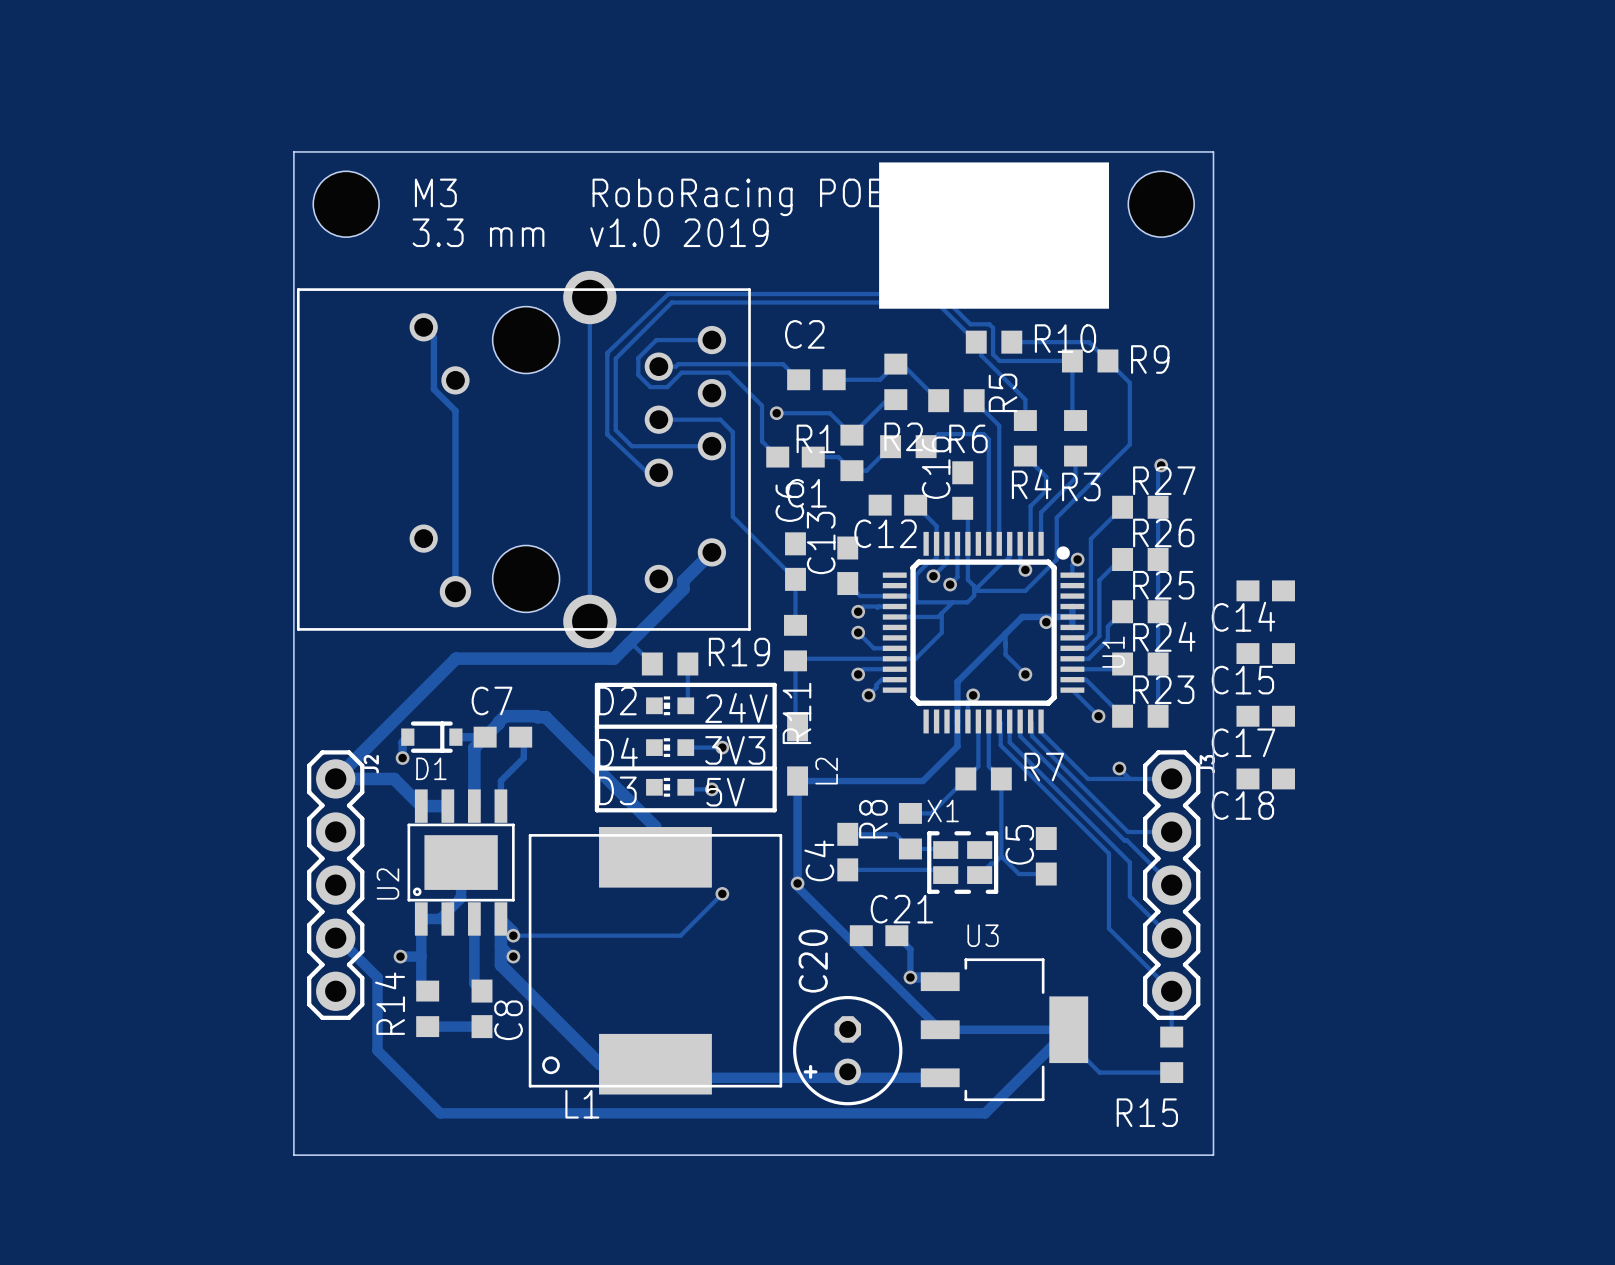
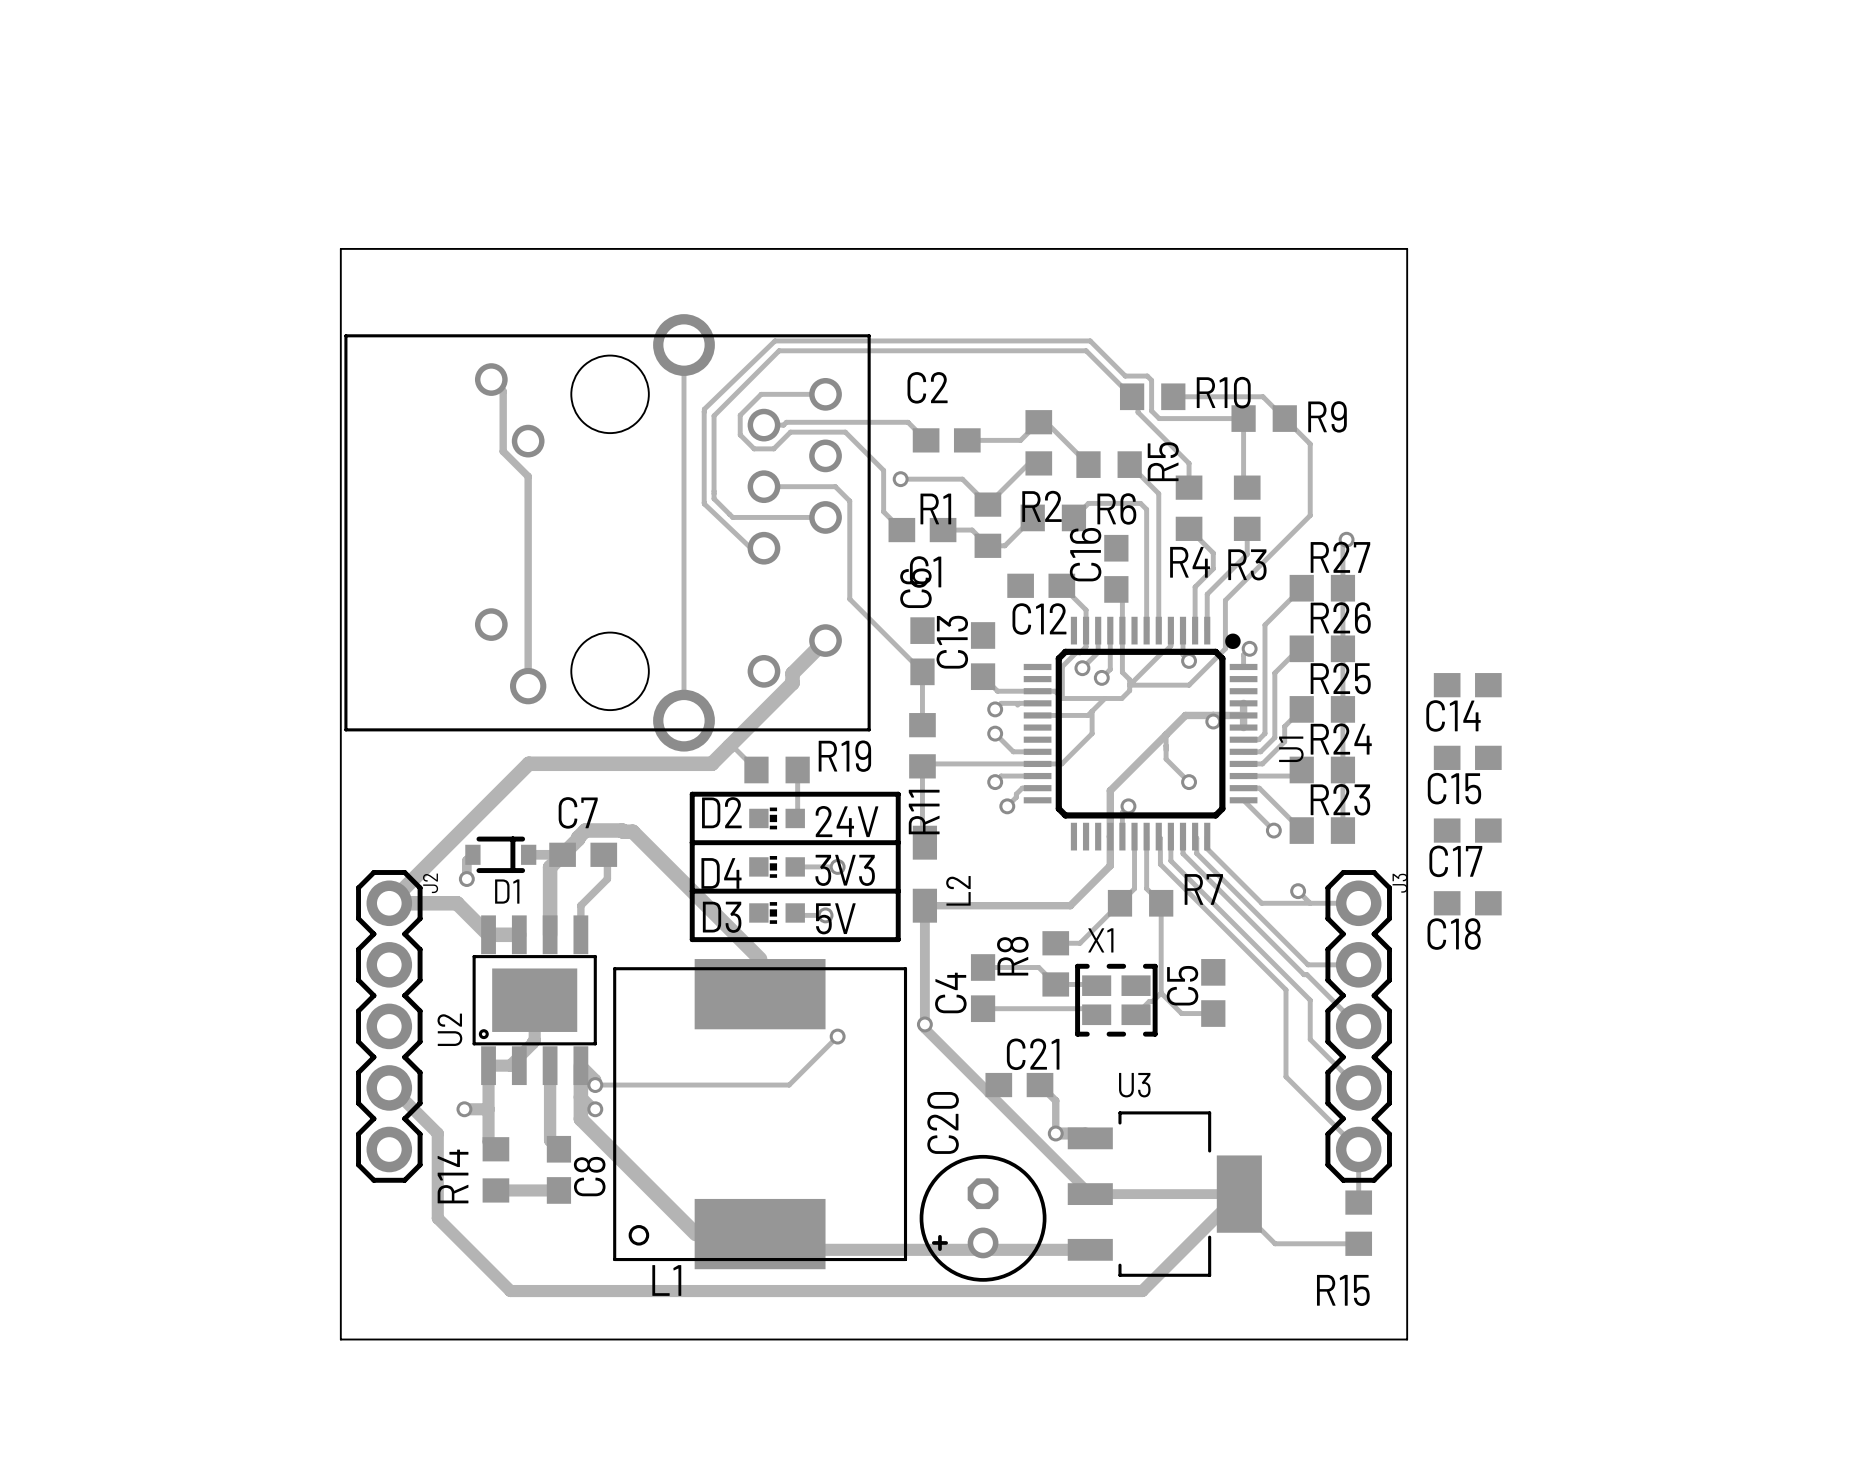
drawing: [879, 162, 1109, 309] -> none
text: M3 (435, 192) -> none
text: RoboRacing POE (737, 197) -> none
hole: (346, 204) -> none
hole: (1161, 204) -> none
board edge: (293, 214) (293, 151) (1213, 151) (1213, 214) -> (340, 248) (1407, 248)
text: 3.3 mm (478, 232) -> none
text: v1.0 2019 (679, 232) -> none

